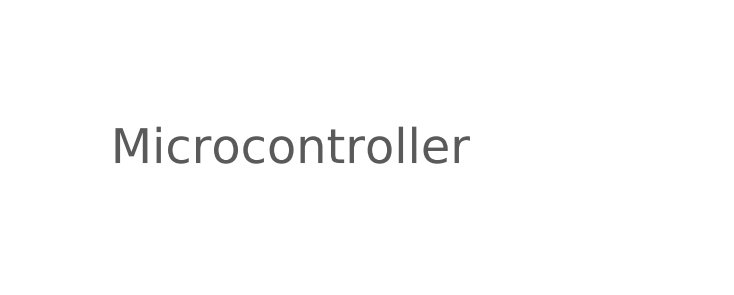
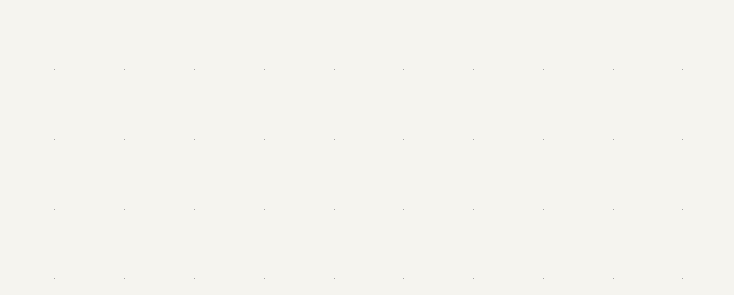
text: Microcontroller (292, 145) -> none

